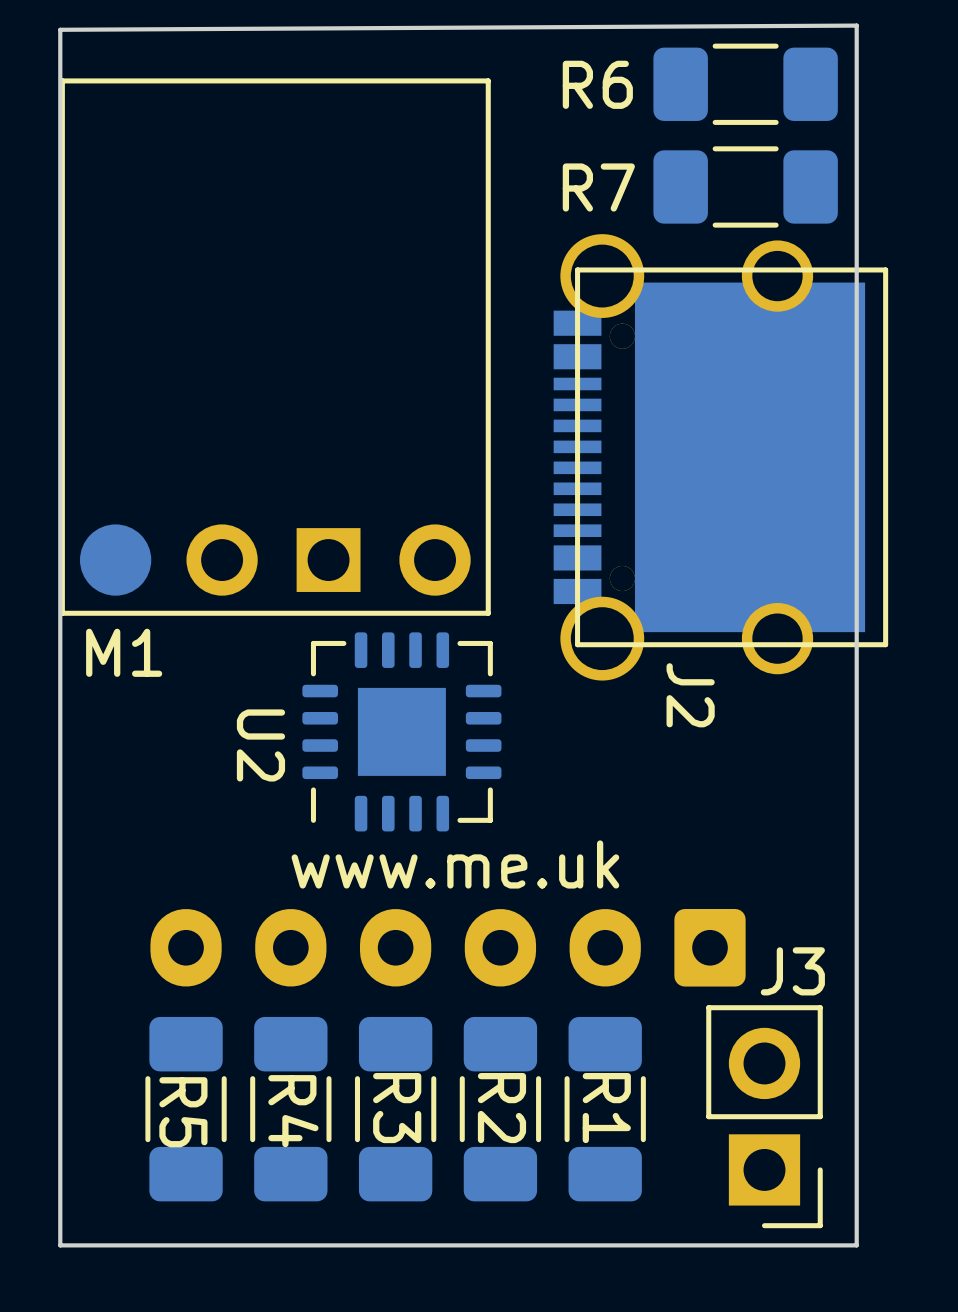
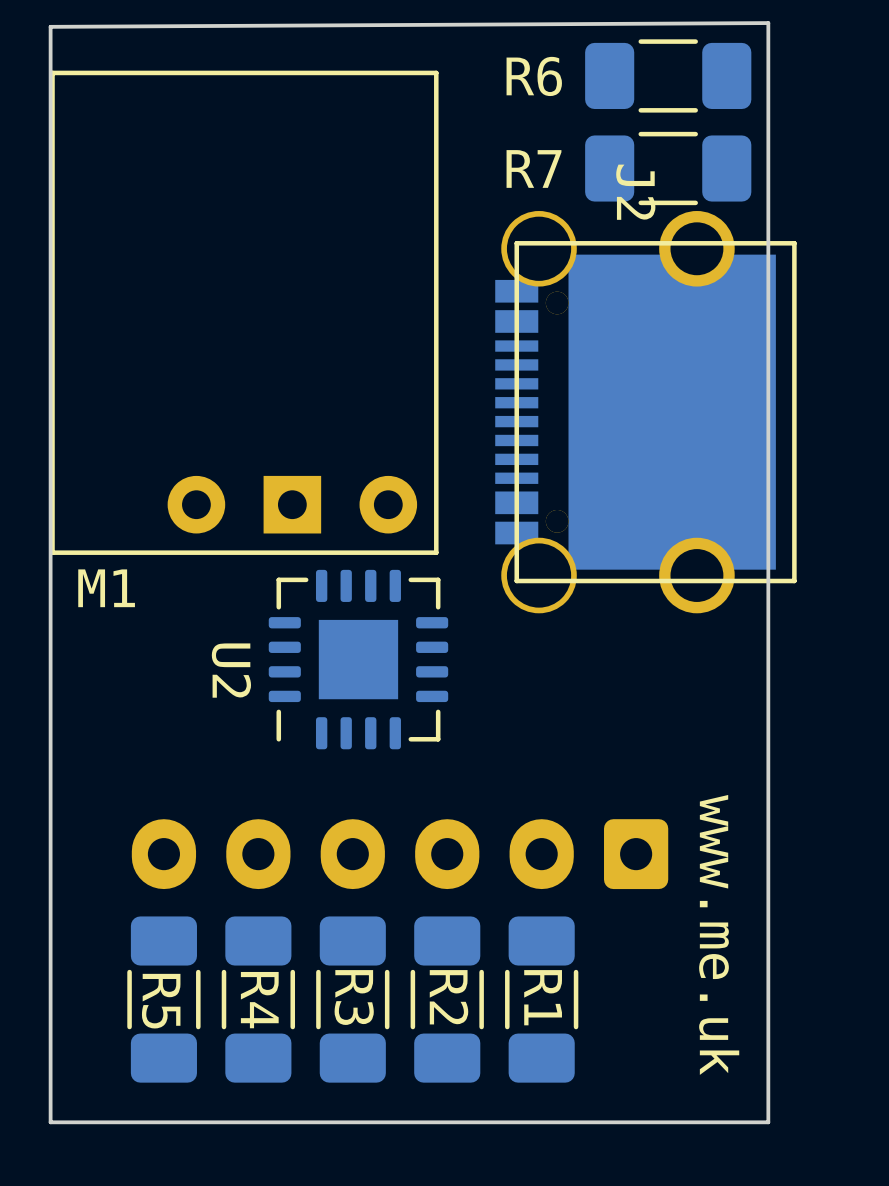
M1 footprint: [59, 78, 491, 616] -> [50, 70, 439, 555]
J2 footprint: [553, 234, 889, 681] -> [495, 211, 797, 614]
J2 name position: J2 (690, 695) -> J2 (635, 192)
text rotation: 0° (455, 864) -> 90° clockwise (719, 934)
J3: (764, 1116) -> none

